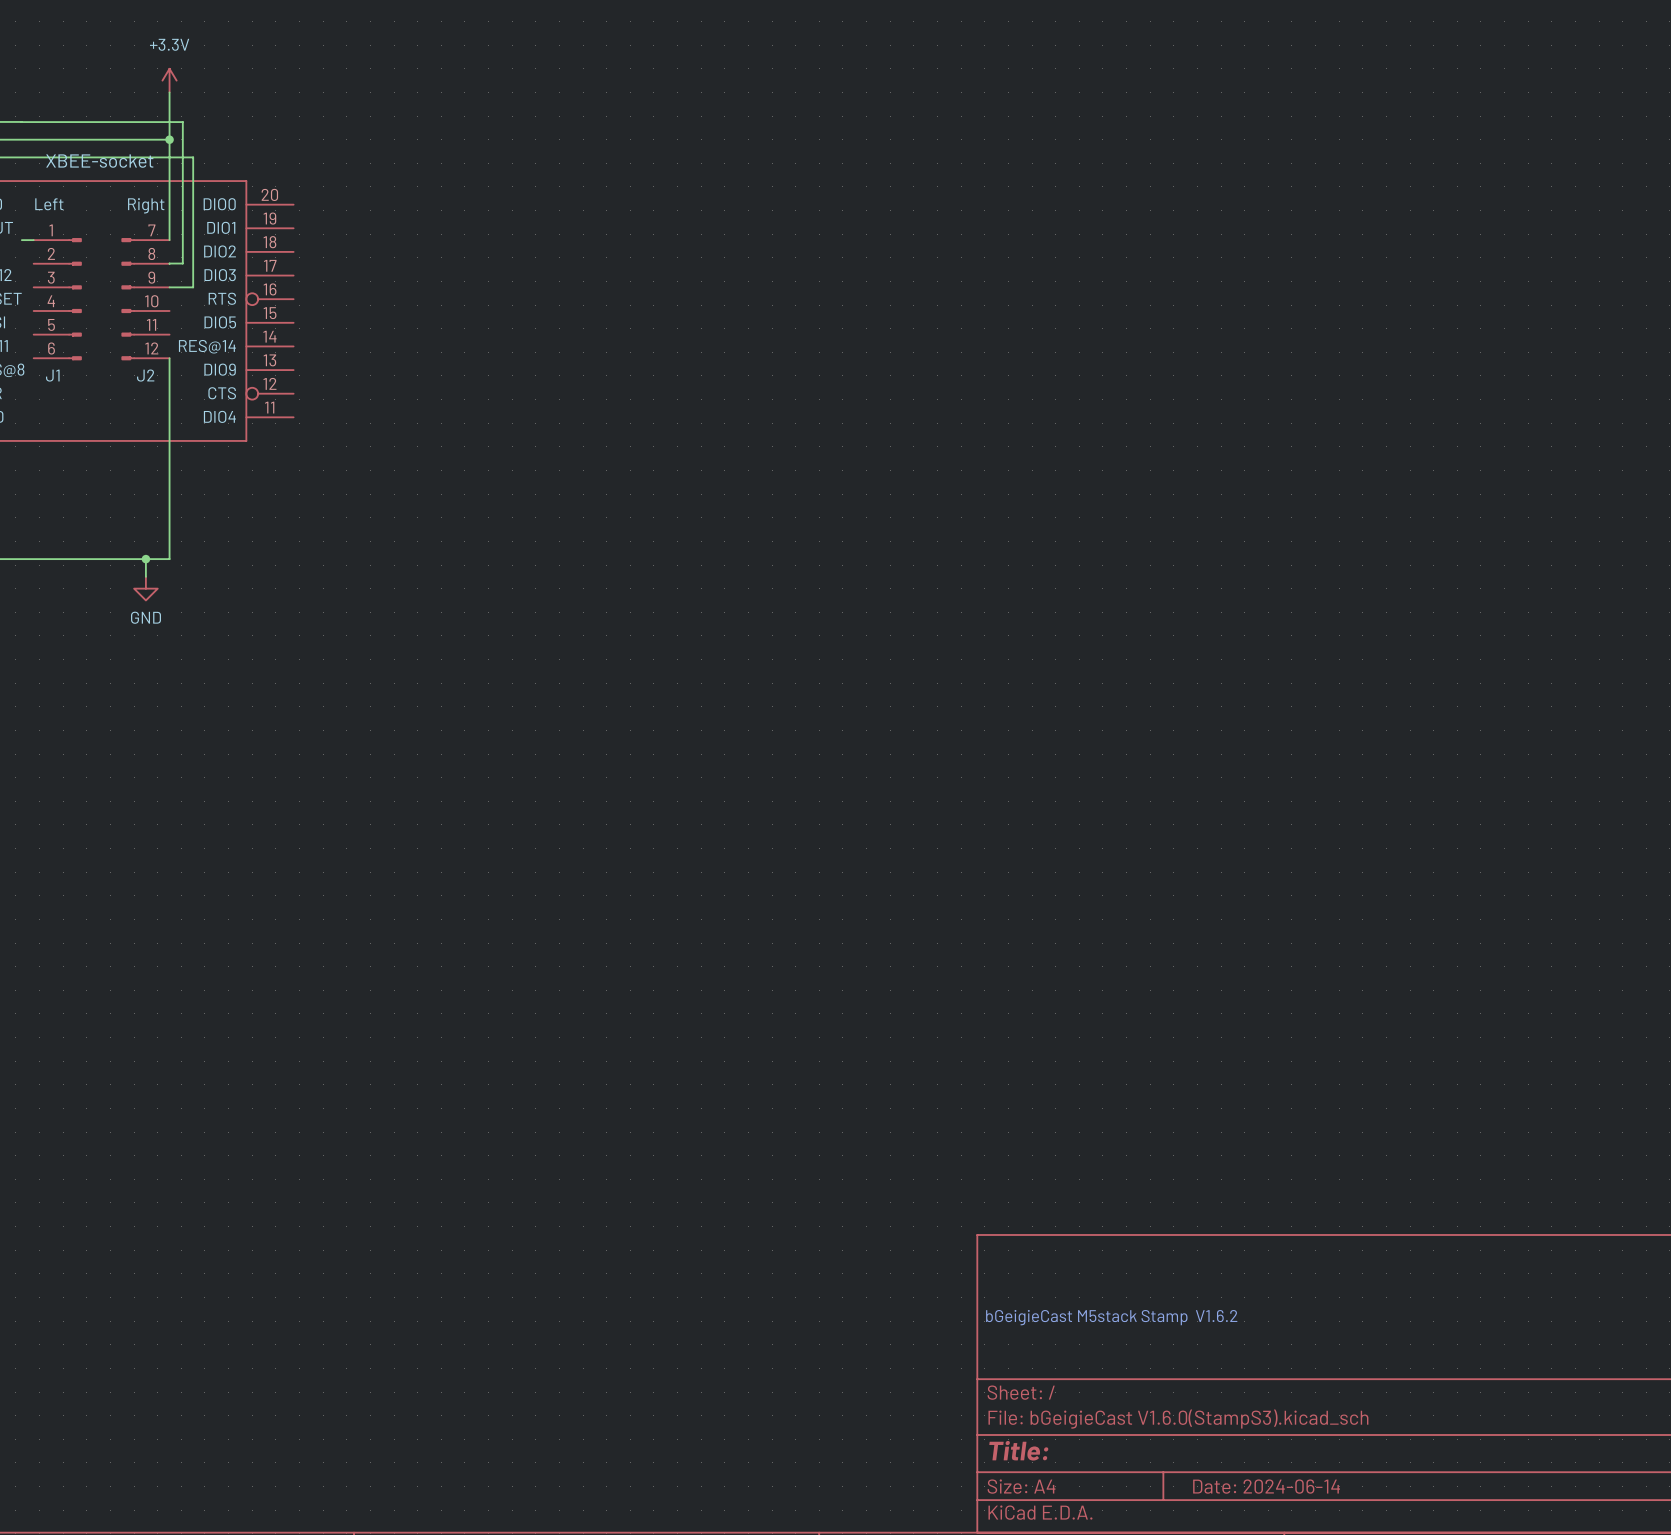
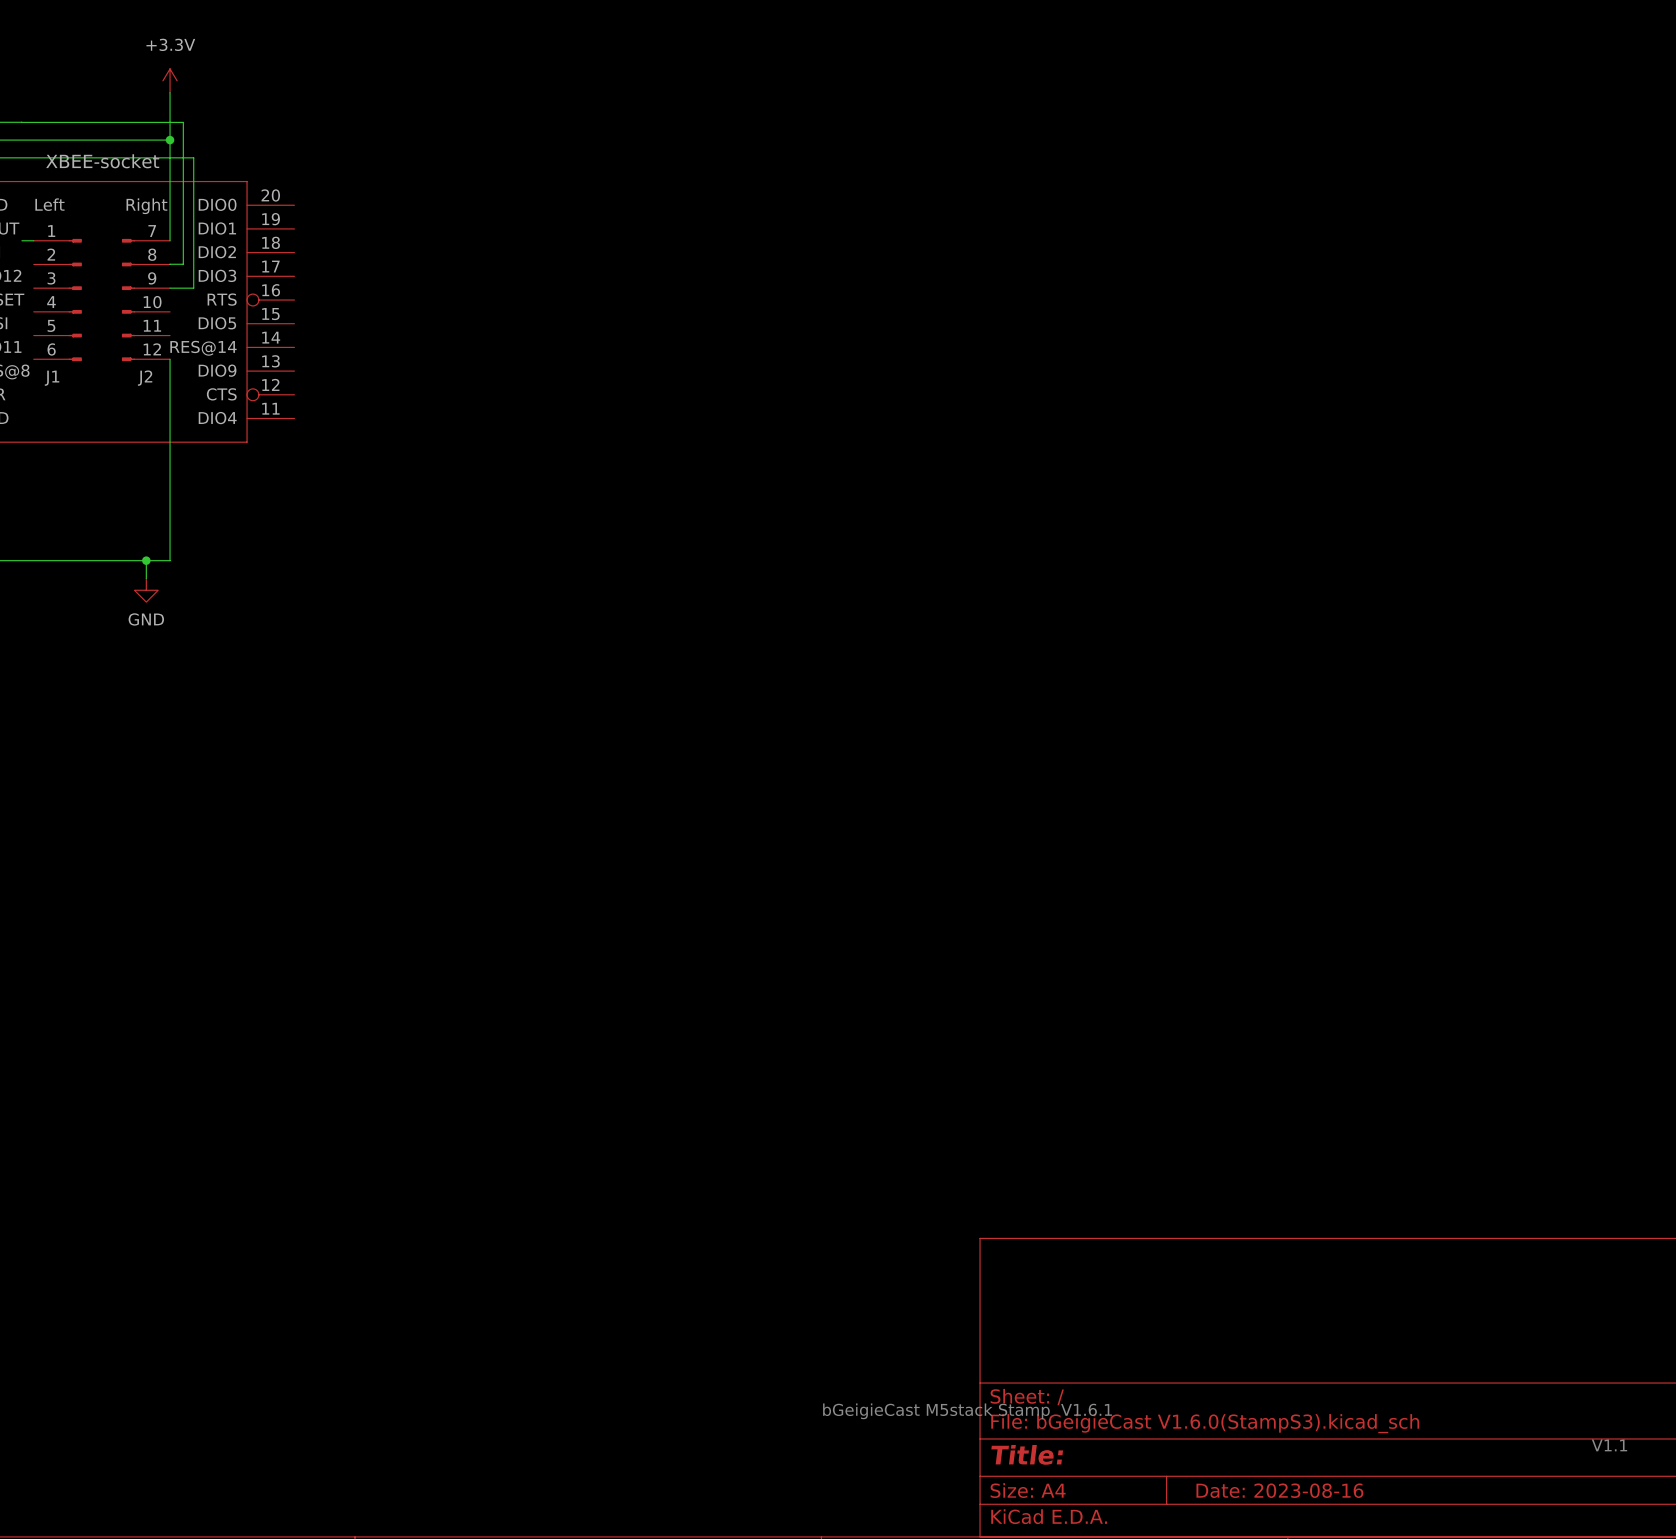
text: bGeigieCast M5stack Stamp V1.6.2 (1111, 1317) -> none
text: none -> bGeigieCast M5stack Stamp V1.6.1 (967, 1411)
text: none -> V1.1 (1609, 1445)
title block: Date: 2024-06-14 (1266, 1486) -> Date: 2023-08-16 (1279, 1490)

